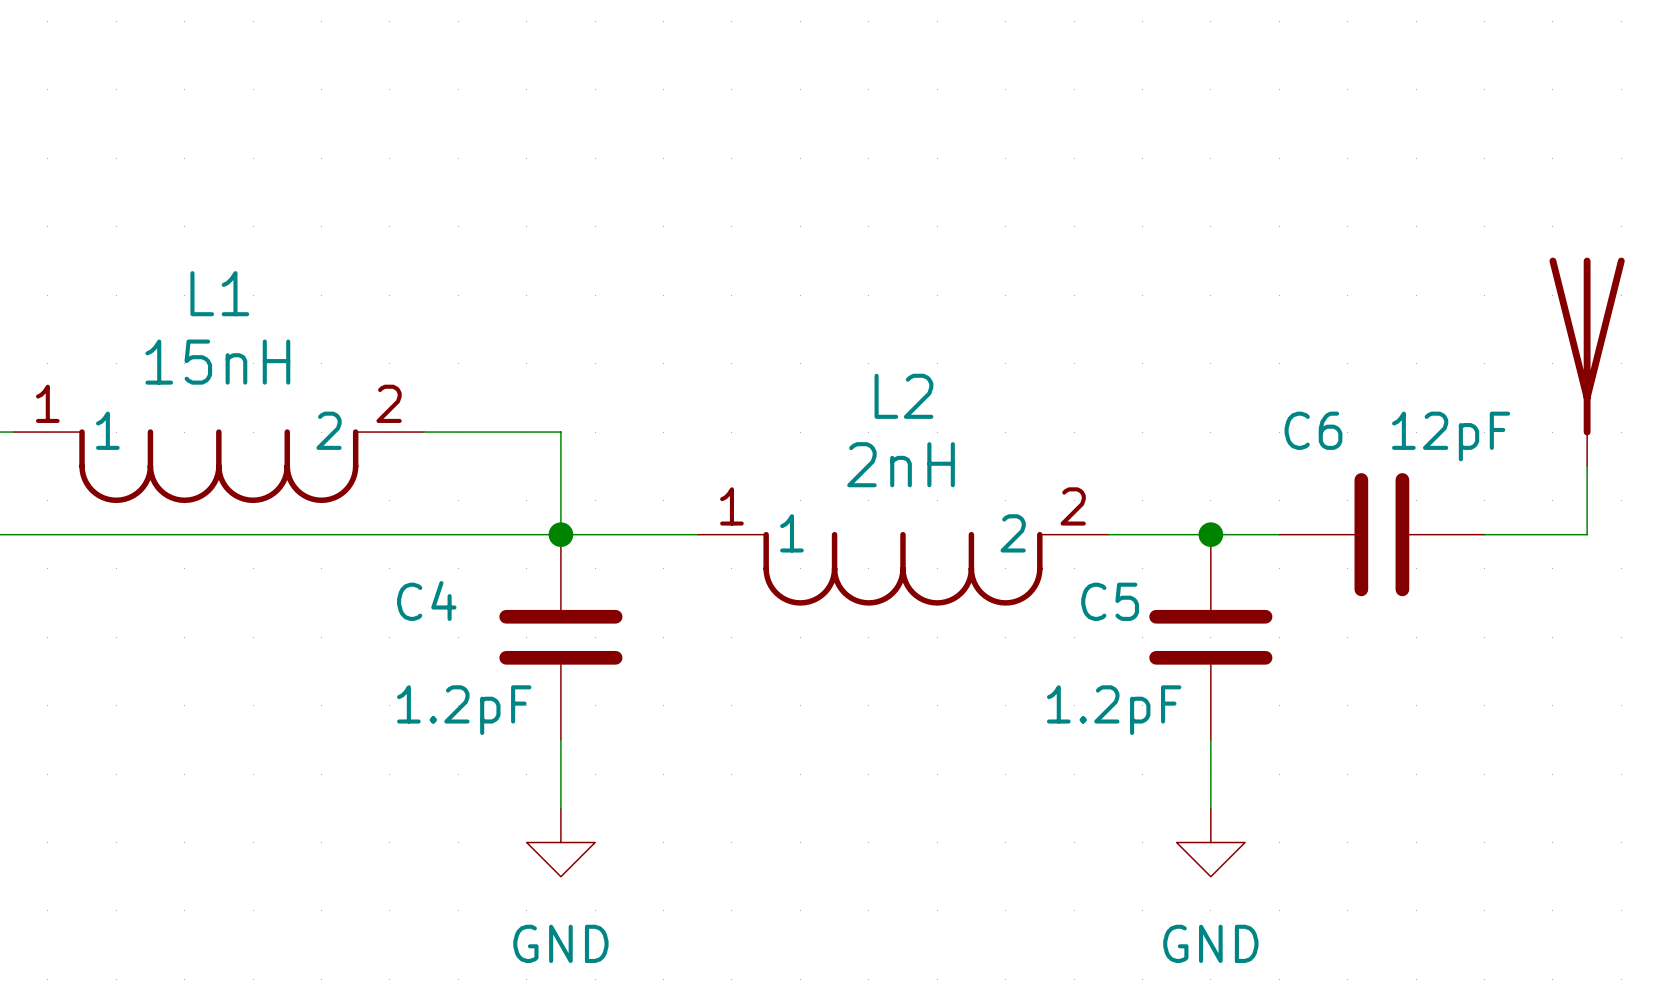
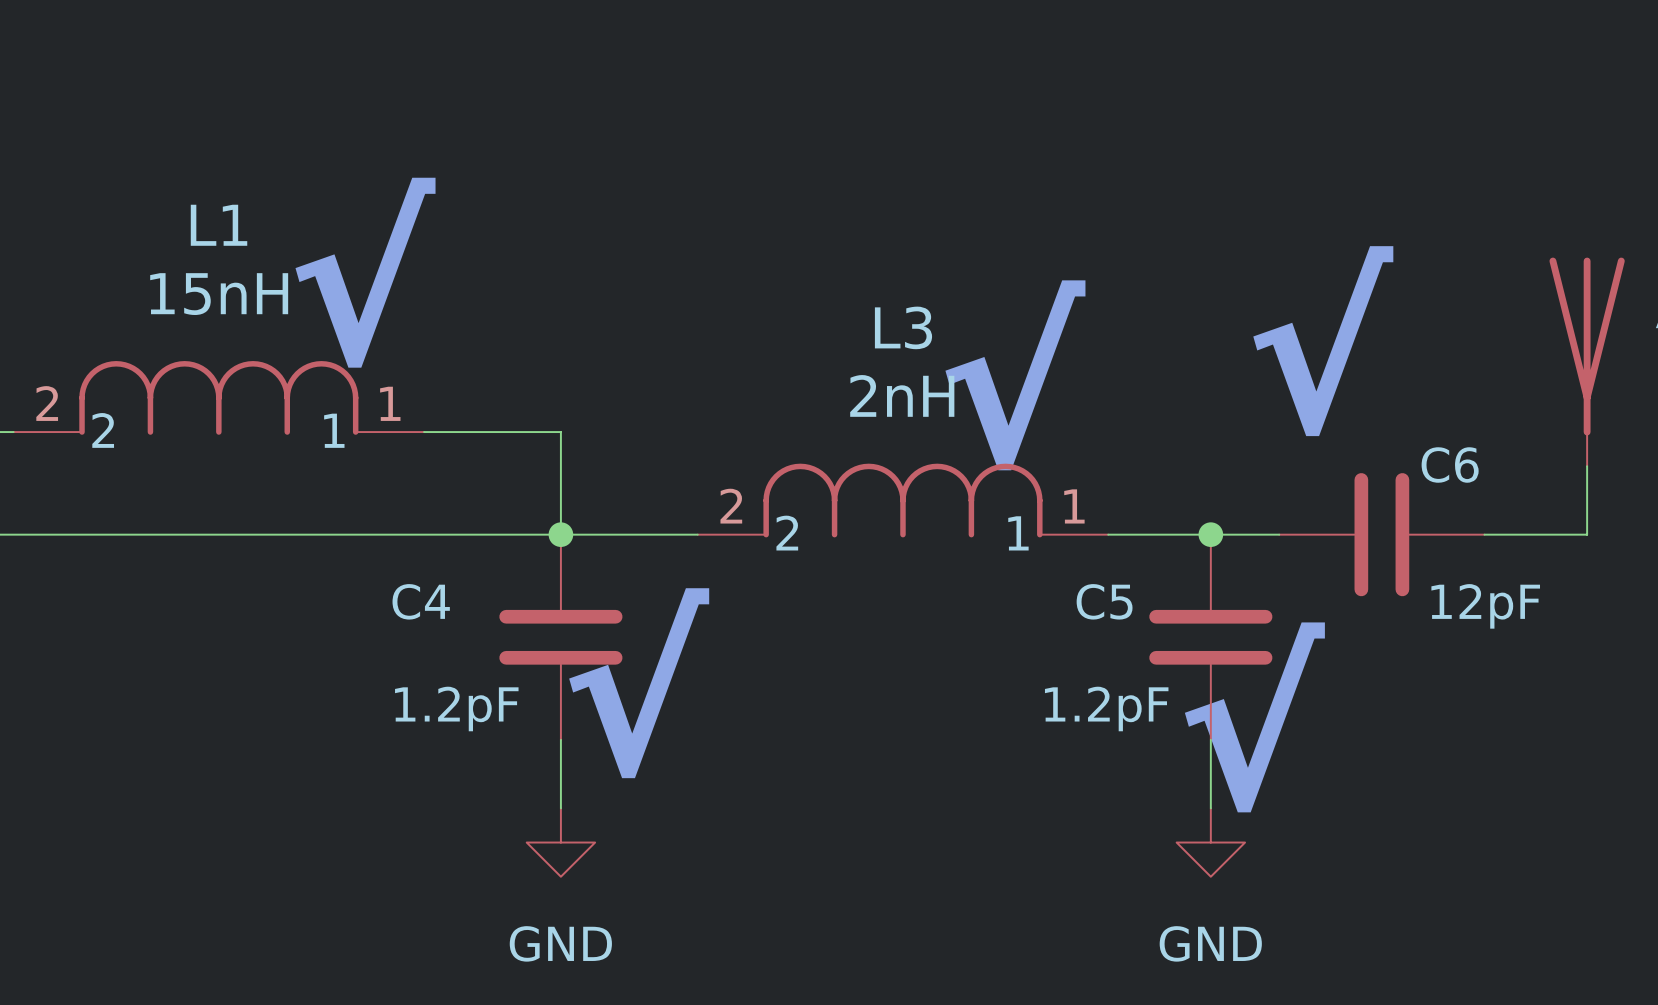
text: none -> √ (365, 272)
text: none -> √ (1323, 341)
text: none -> √ (1015, 375)
C6 name position: C6 (1313, 430) -> C6 (1450, 464)
C6 value position: 12pF (1451, 436) -> 12pF (1485, 606)
L1 rotation: 0° (218, 466) -> 180° (218, 397)
L3: none -> 2nH (902, 500)
L2: 2nH (902, 568) -> none
text: none -> √ (639, 683)
text: none -> √ (1254, 717)

